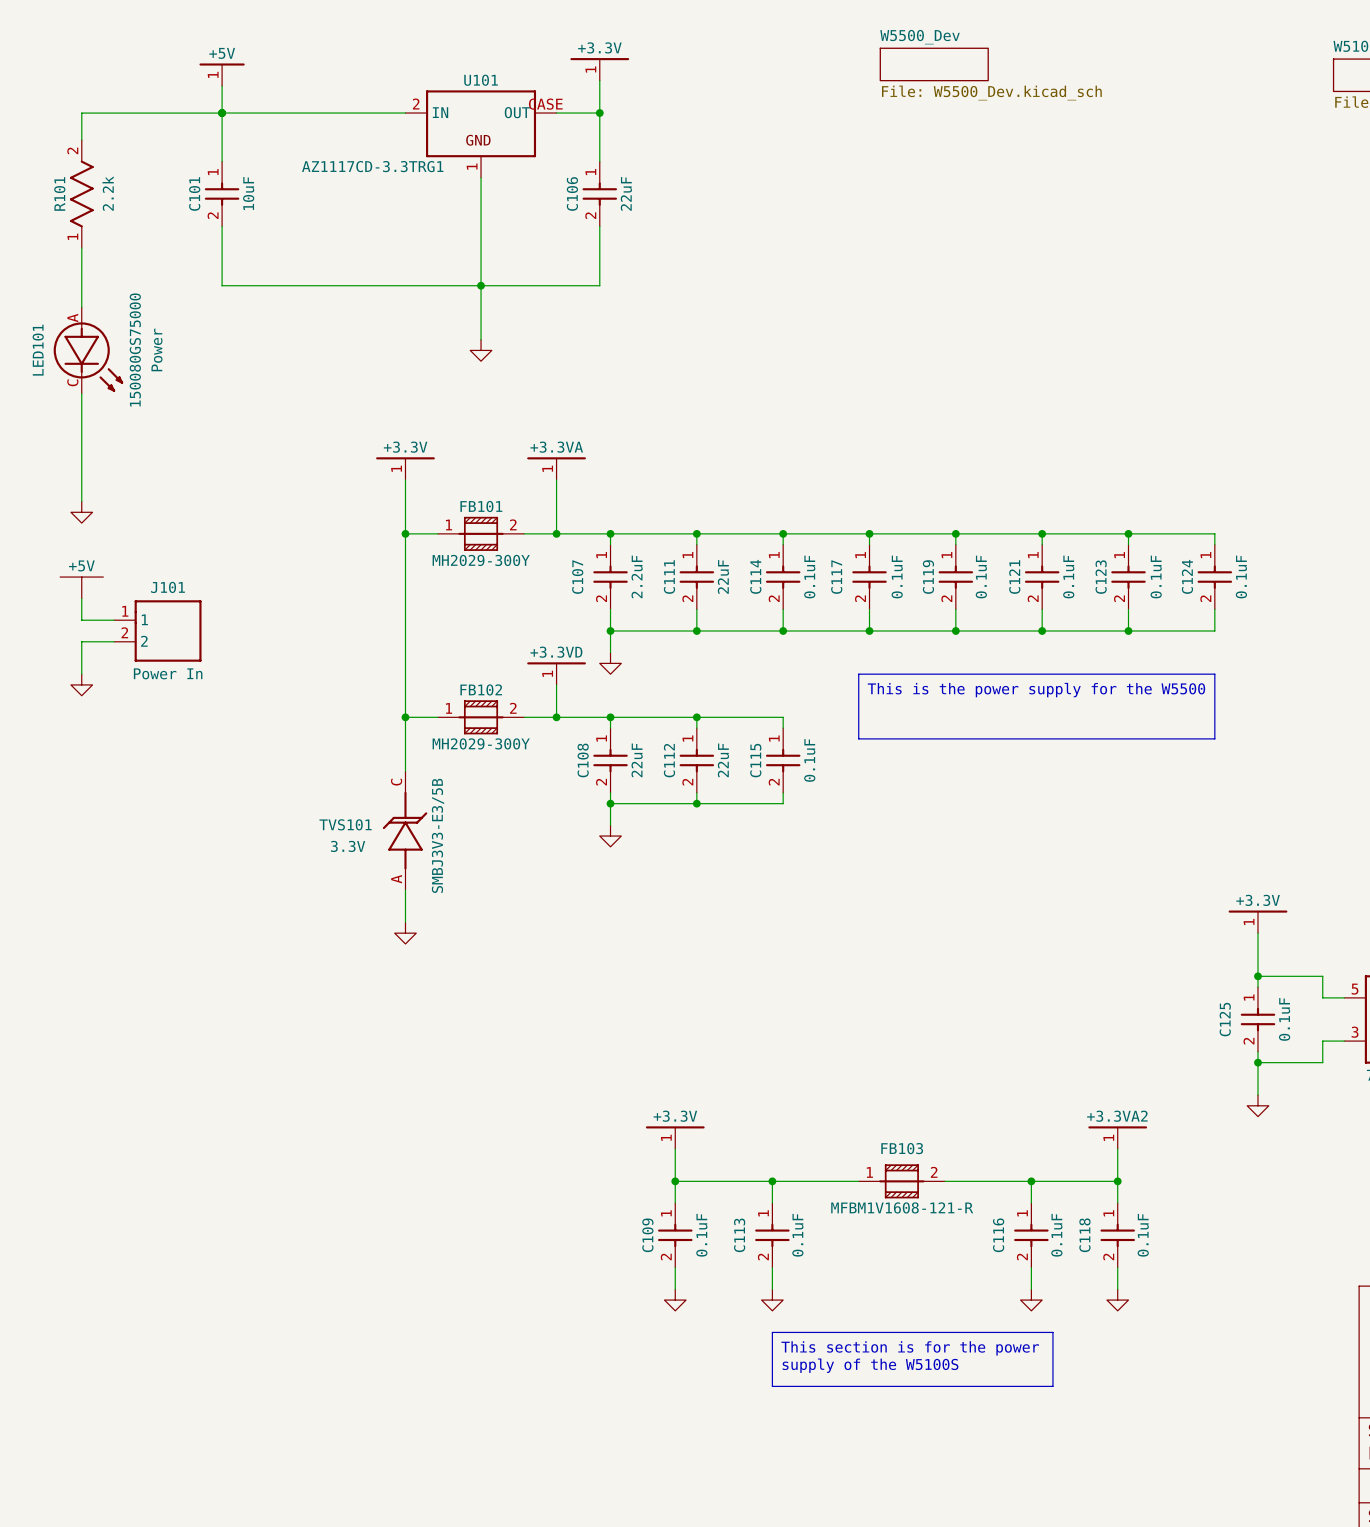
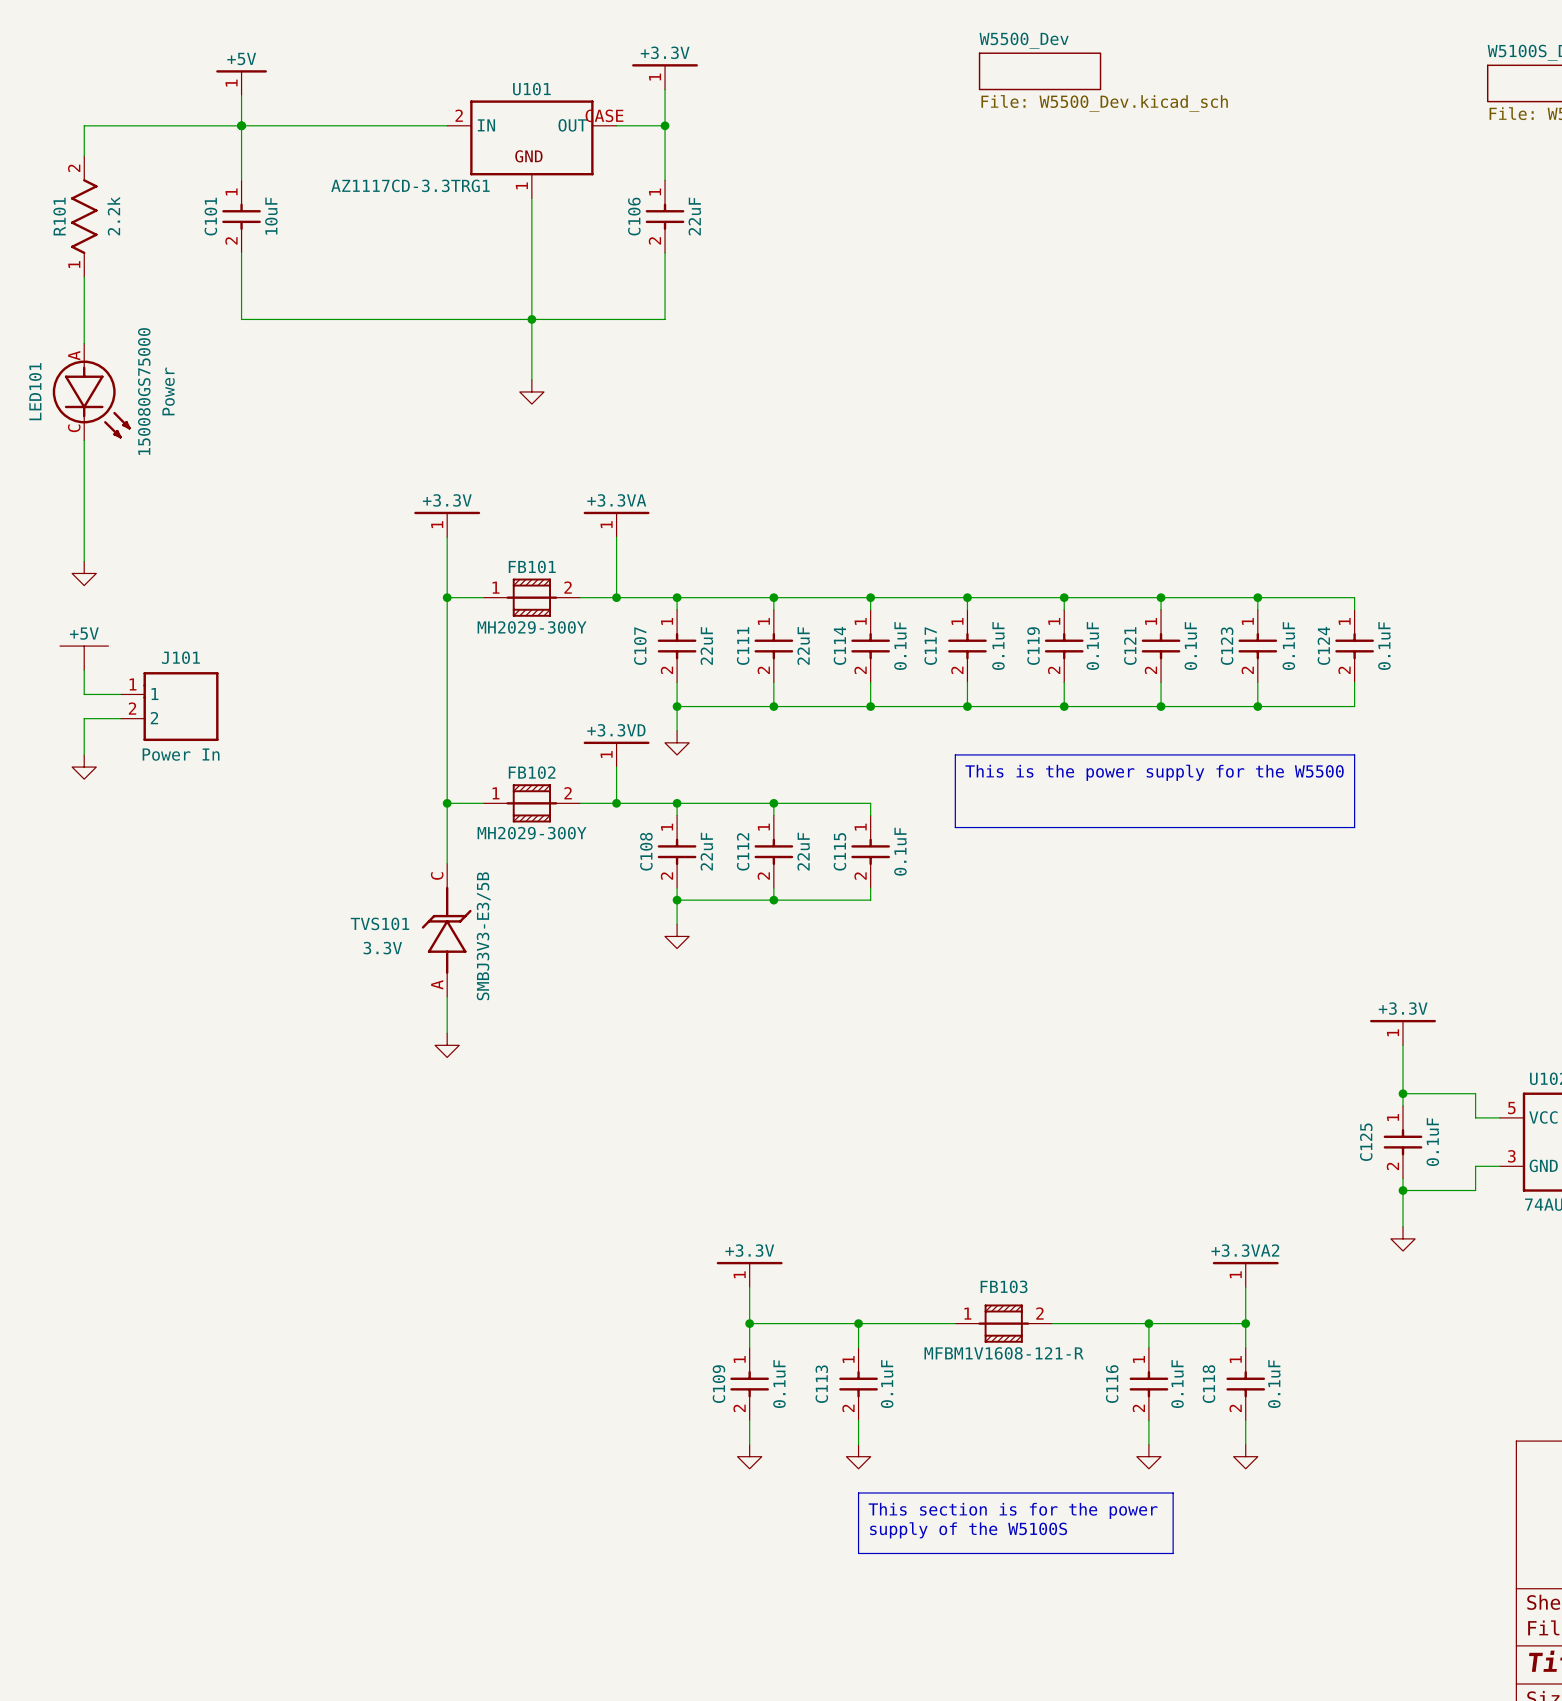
C107 value: 2.2uF (637, 576) -> 22uF (706, 645)

